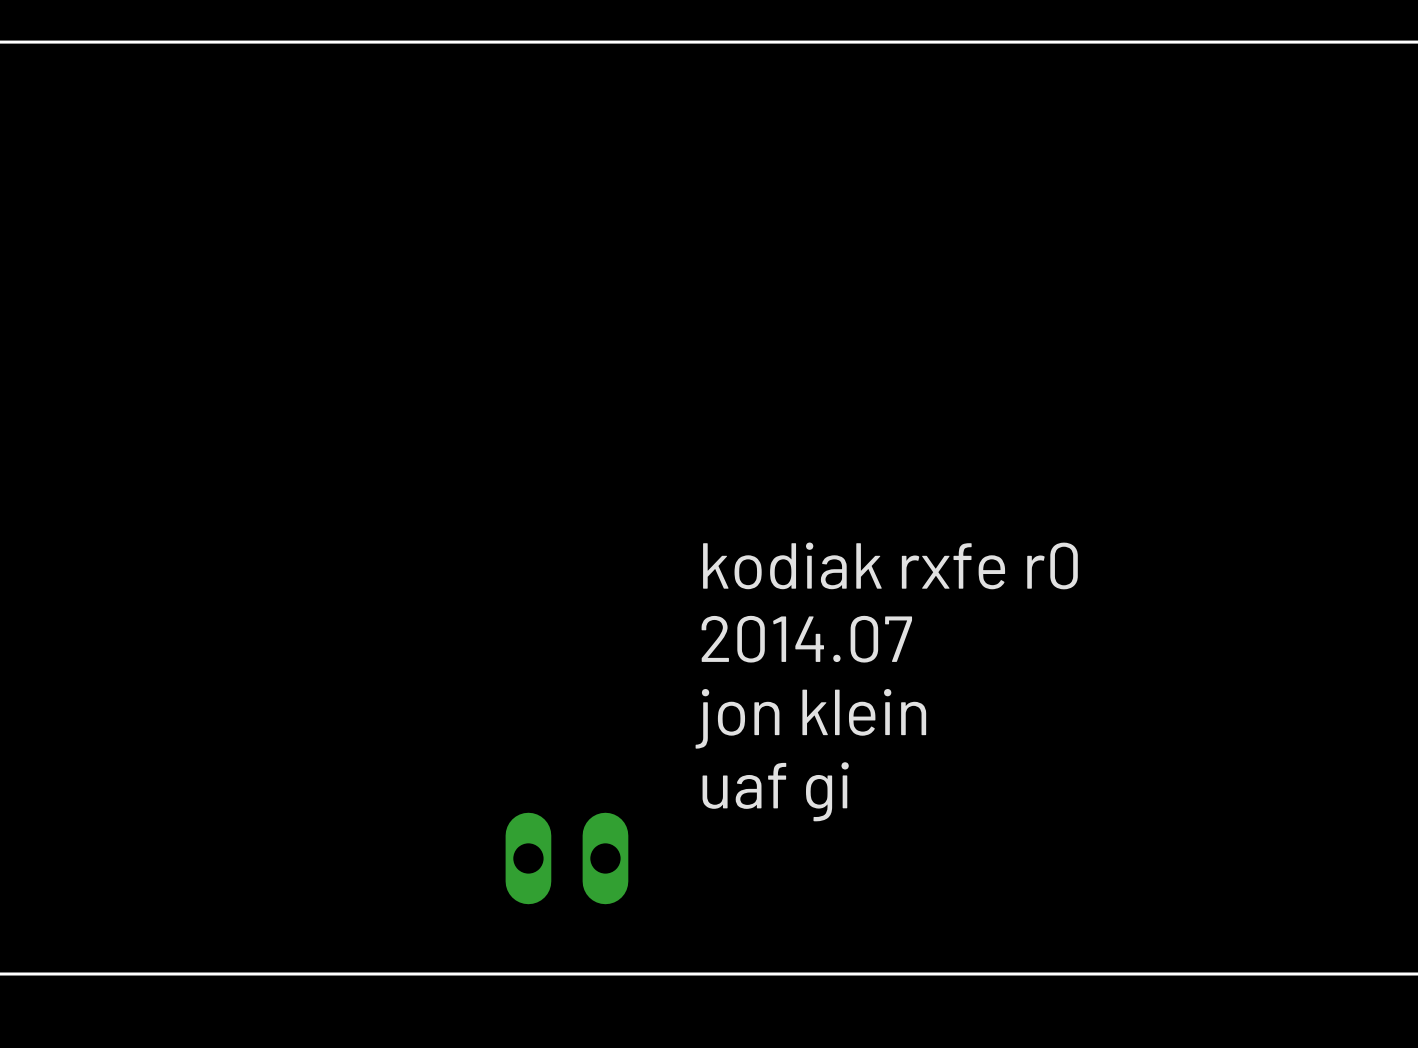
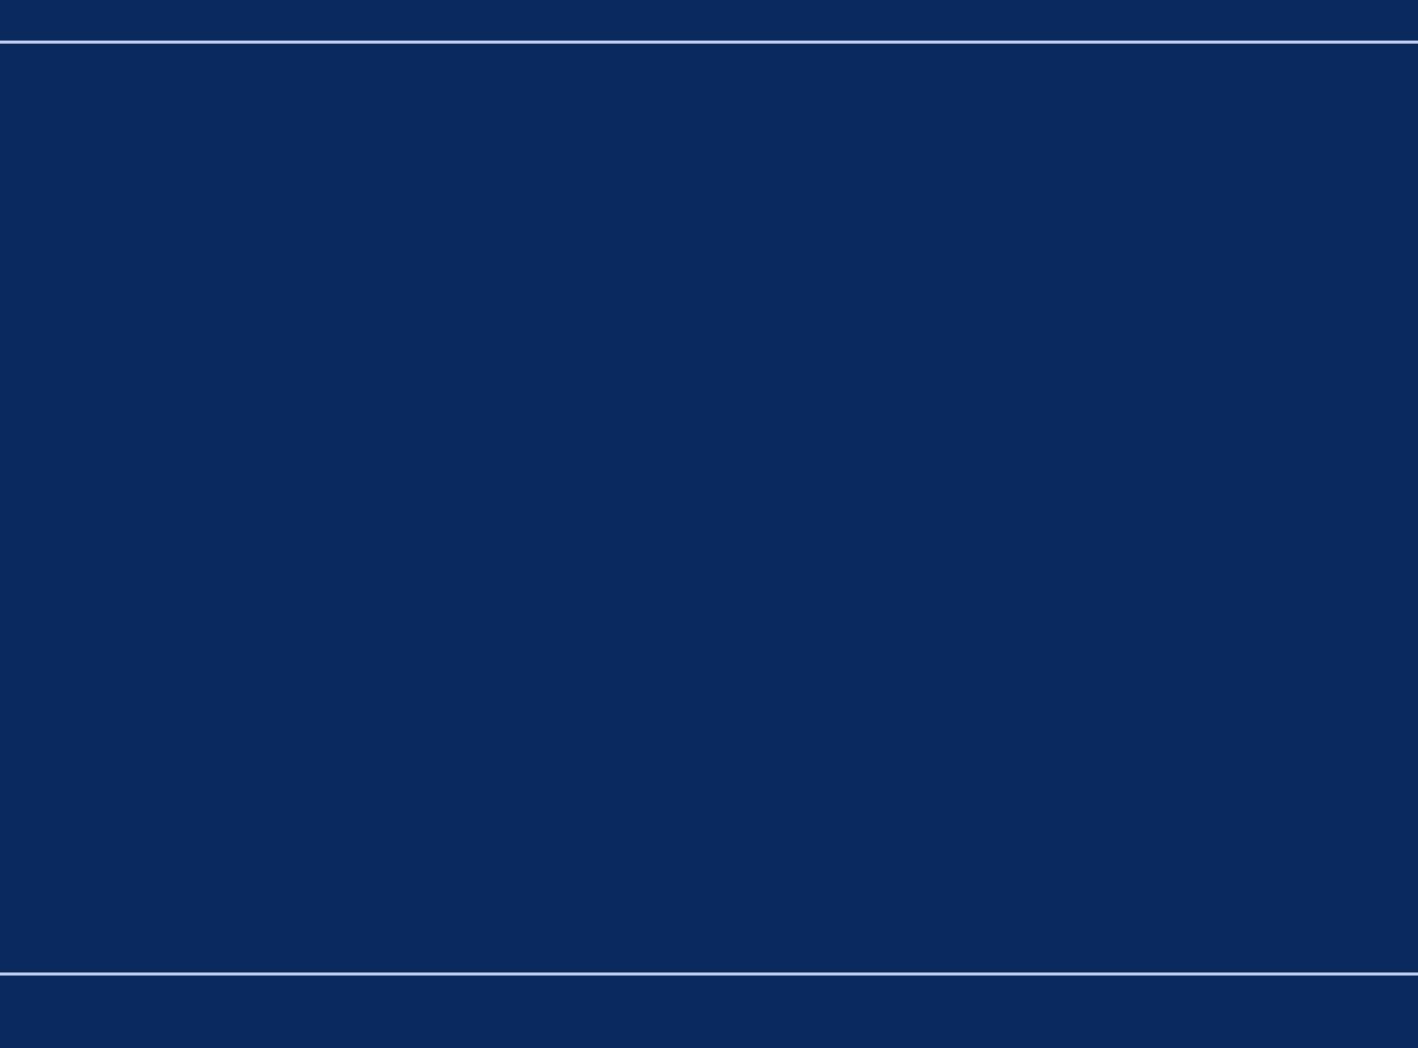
text: kodiak rxfe r0 (890, 565) -> none
text: 2014.07 (806, 639) -> none
text: jon klein (810, 718) -> none
text: uaf gi (775, 791) -> none
part: (566, 858) -> none

